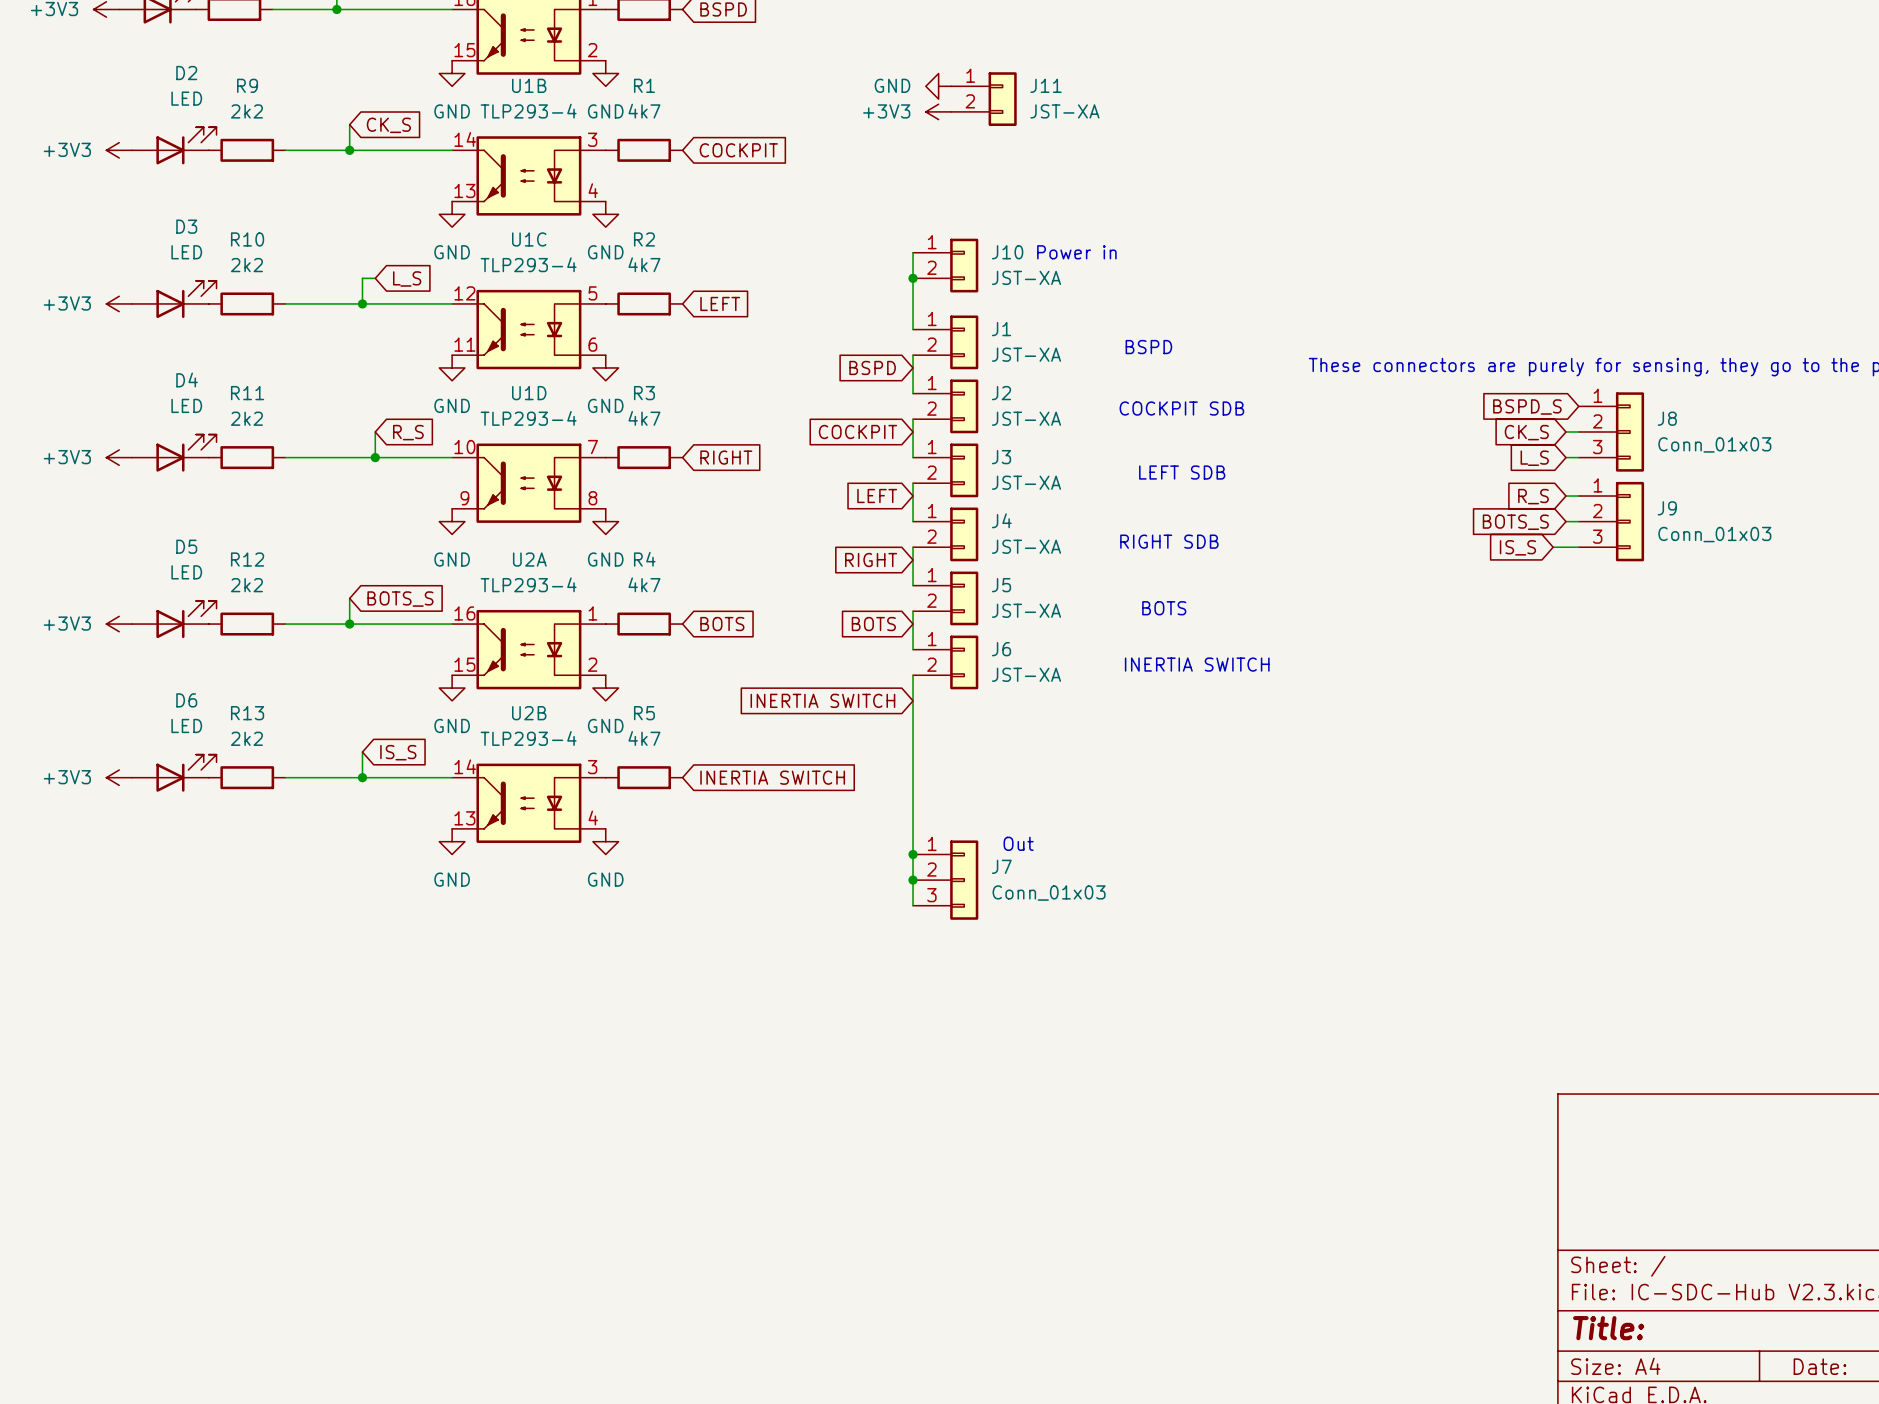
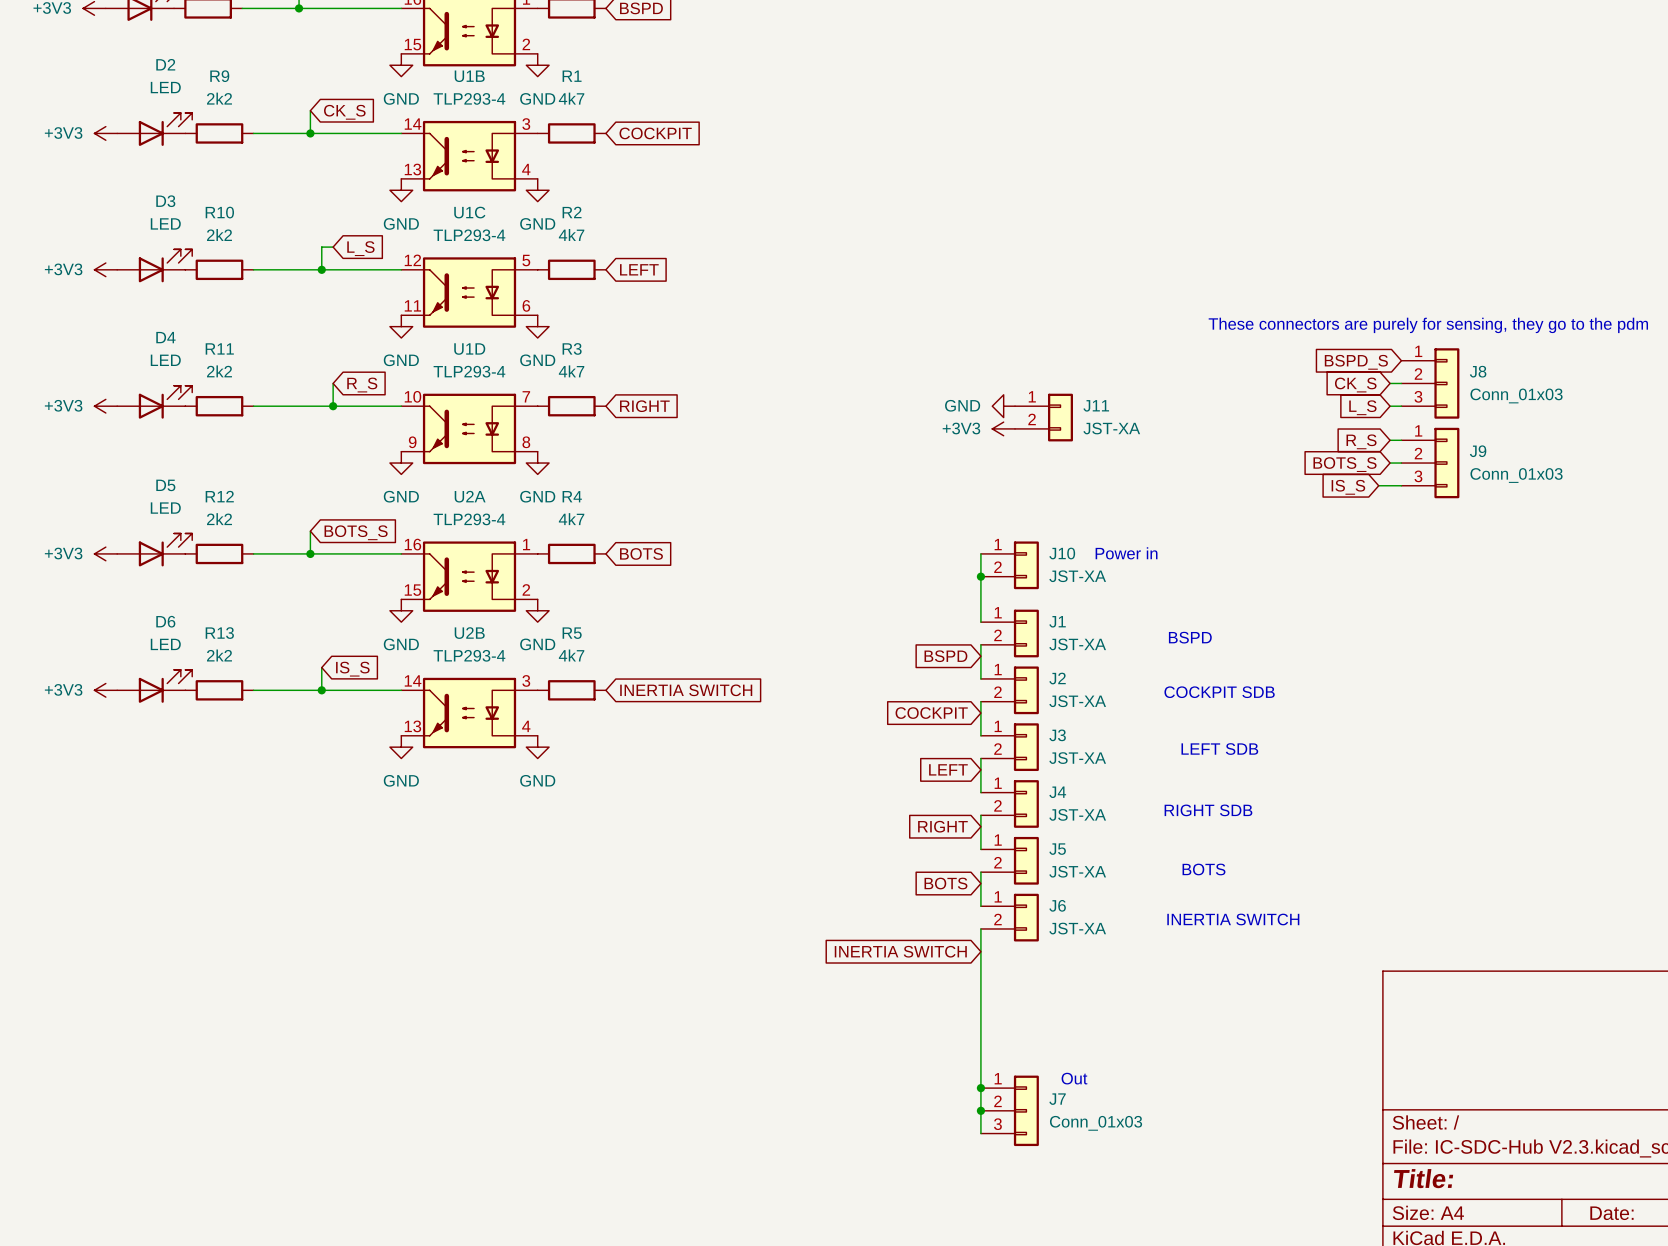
power symbol: GND (938, 86) -> none
J11 position: (984, 99) -> (1044, 417)
power symbol: +3V3 (938, 111) -> none
wire: (913, 252) (913, 329) -> none
text: Power in (1076, 252) -> none
J10 position: (945, 265) -> (1009, 565)
junction: (913, 278) -> none
J1 position: (945, 342) -> (1009, 633)
text: BSPD (1148, 347) -> none
wire: (913, 355) (913, 393) -> none
global label: BSPD (872, 367) -> none
J2 position: (945, 406) -> (1009, 690)
text: COCKPIT SDB (1181, 408) -> none
wire: (913, 419) (913, 457) -> none
global label: COCKPIT (857, 431) -> none
power symbol: none -> GND (1003, 406)
J3 position: (945, 470) -> (1009, 747)
text: LEFT SDB (1182, 472) -> none
wire: (913, 483) (913, 521) -> none
power symbol: none -> +3V3 (1003, 428)
global label: LEFT (877, 496) -> none
J4 position: (945, 534) -> (1009, 803)
text: RIGHT SDB (1169, 541) -> none
wire: (913, 547) (913, 585) -> none
global label: RIGHT (871, 560) -> none
J5 position: (945, 598) -> (1009, 860)
text: BOTS (1164, 608) -> none
wire: (913, 611) (913, 649) -> (980, 644) (980, 678)
text: none -> Power in (1126, 553)
global label: BOTS (873, 624) -> none
wire: none -> (980, 553) (980, 622)
junction: none -> (980, 576)
J6 position: (945, 662) -> (1009, 917)
text: INERTIA SWITCH (1197, 664) -> none
wire: (913, 675) (913, 905) -> none
global label: INERTIA SWITCH (822, 700) -> none
text: none -> BSPD (1190, 637)
global label: none -> BSPD (945, 656)
text: none -> COCKPIT SDB (1219, 692)
wire: none -> (980, 701) (980, 735)
global label: none -> COCKPIT (931, 713)
text: Out (1018, 843) -> none
text: none -> LEFT SDB (1219, 749)
junction: (913, 854) -> none
wire: none -> (980, 758) (980, 792)
global label: none -> LEFT (948, 769)
junction: (913, 880) -> none
J7 position: (945, 880) -> (1009, 1110)
text: none -> RIGHT SDB (1208, 810)
wire: none -> (980, 815) (980, 849)
global label: none -> RIGHT (942, 826)
text: none -> BOTS (1203, 869)
wire: none -> (980, 872) (980, 906)
global label: none -> BOTS (945, 883)
text: none -> INERTIA SWITCH (1233, 919)
wire: none -> (980, 928) (980, 1133)
global label: none -> INERTIA SWITCH (900, 951)
text: none -> Out (1074, 1078)
junction: none -> (980, 1088)
junction: none -> (980, 1110)

